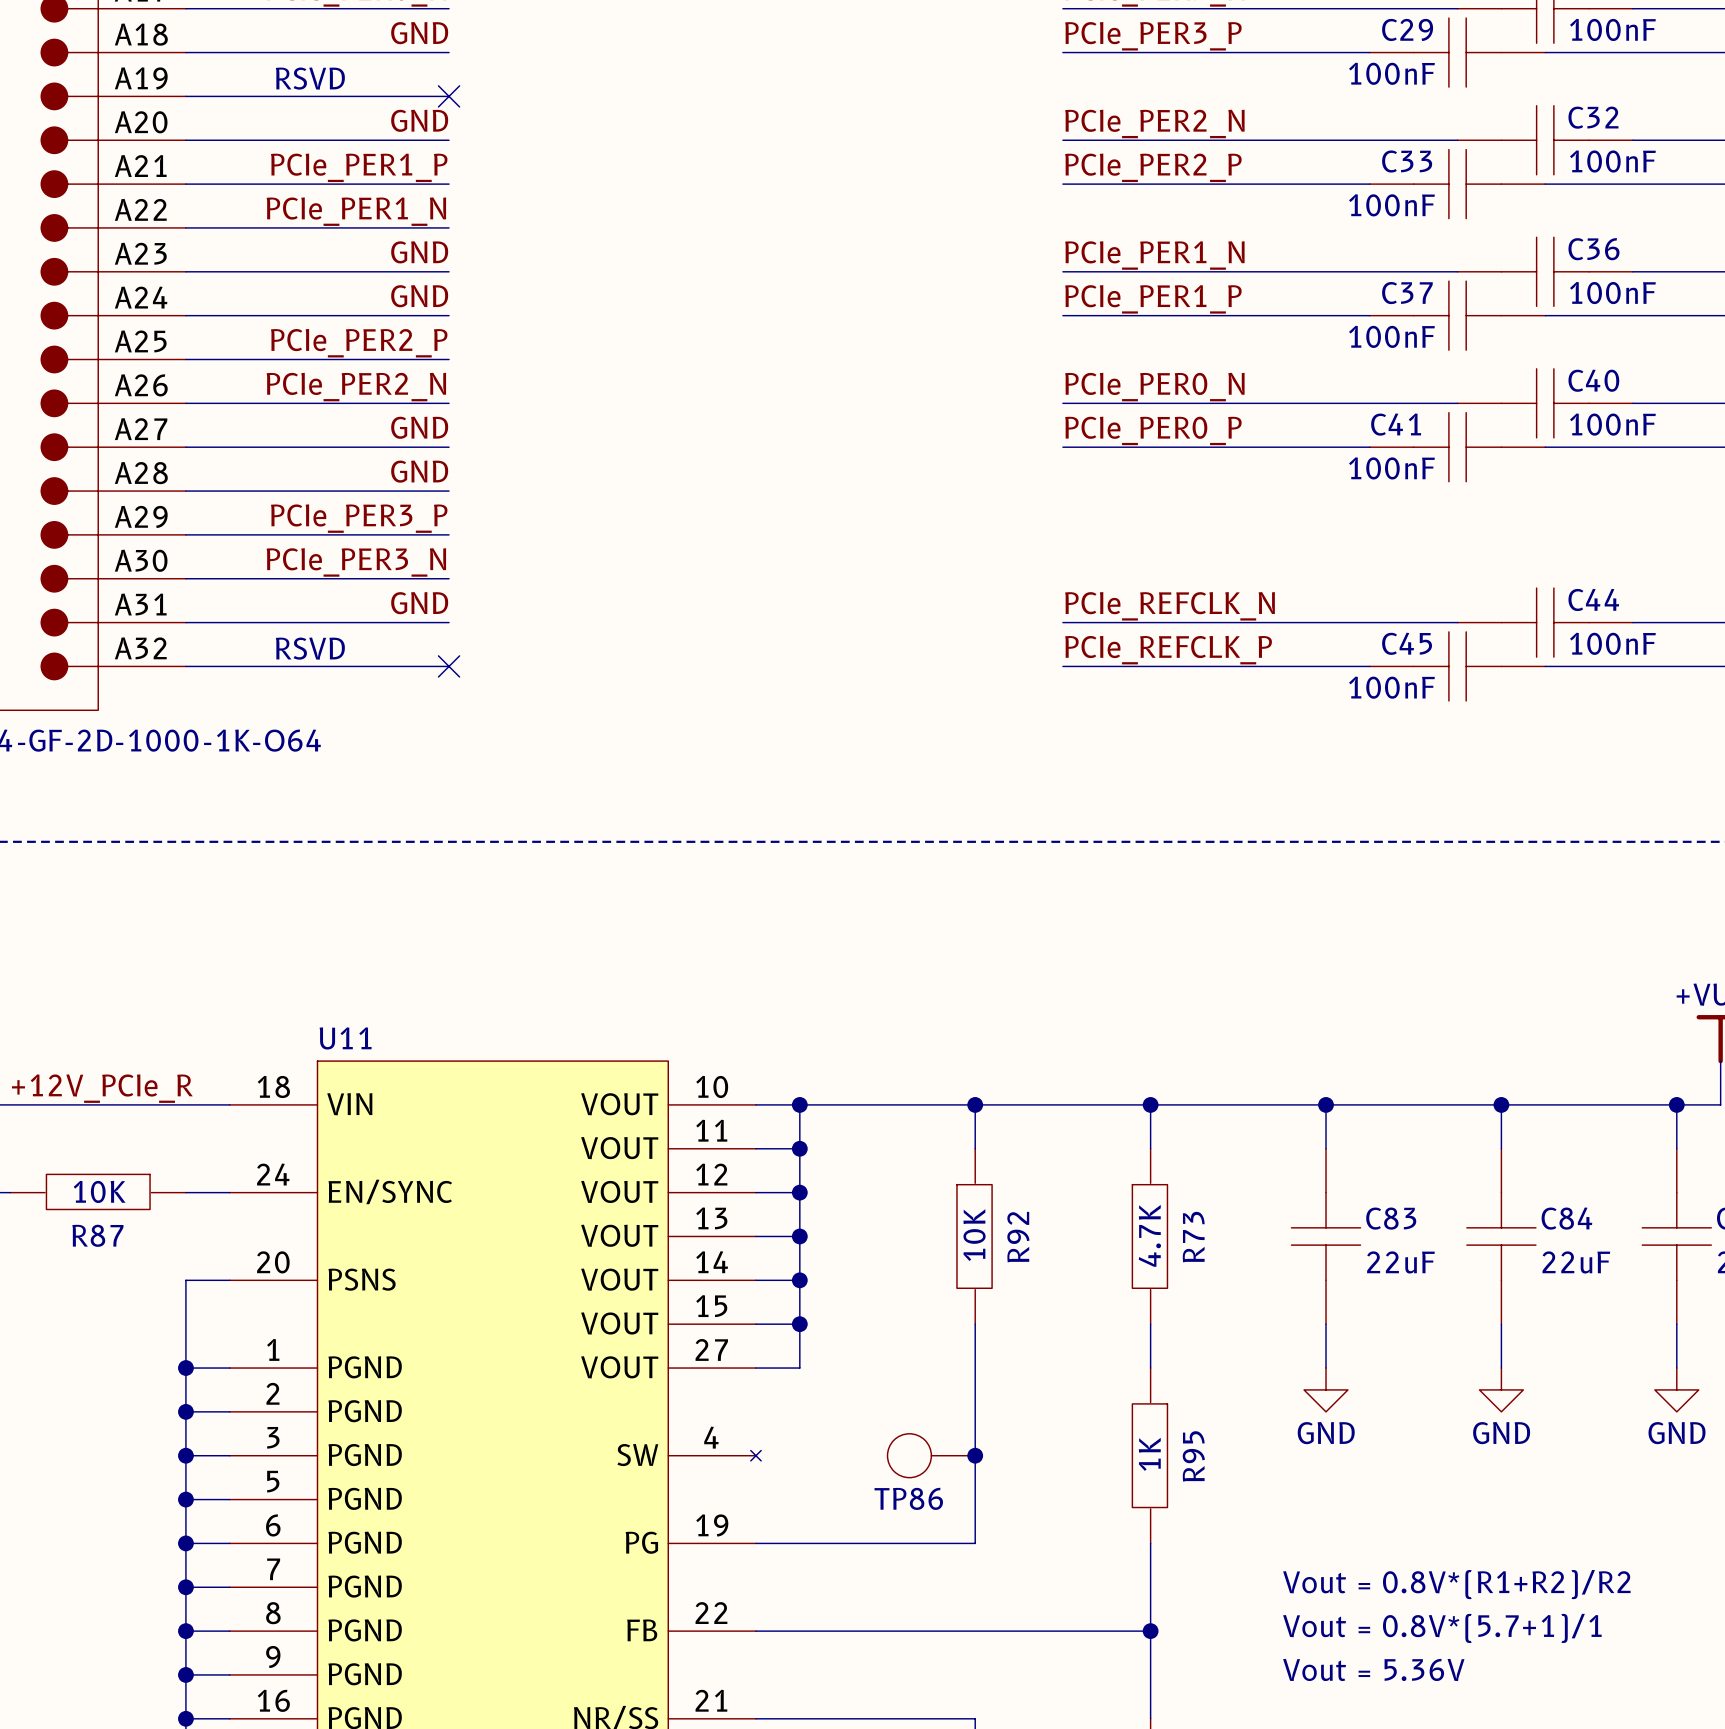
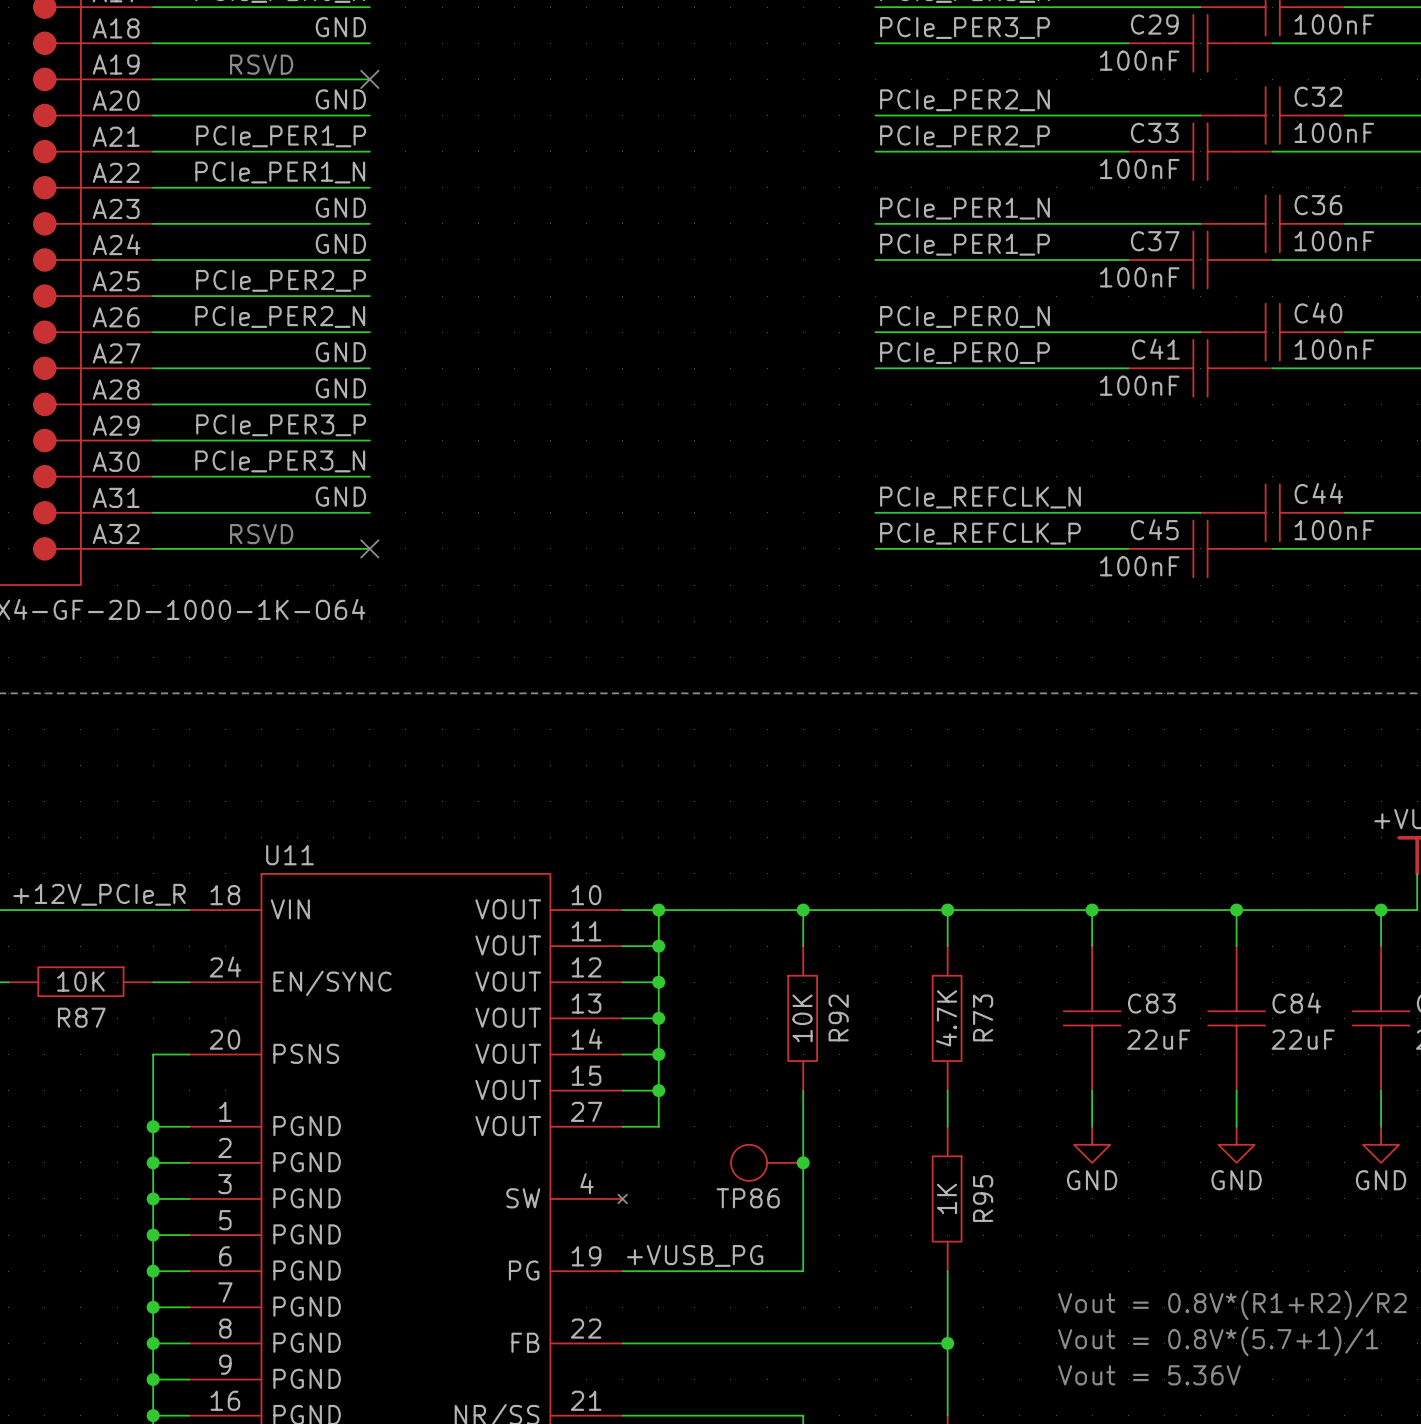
TP86 position: (931, 1455) -> (767, 1162)
junction position: (975, 1455) -> (803, 1162)
label: none -> +VUSB_PG (695, 1255)

